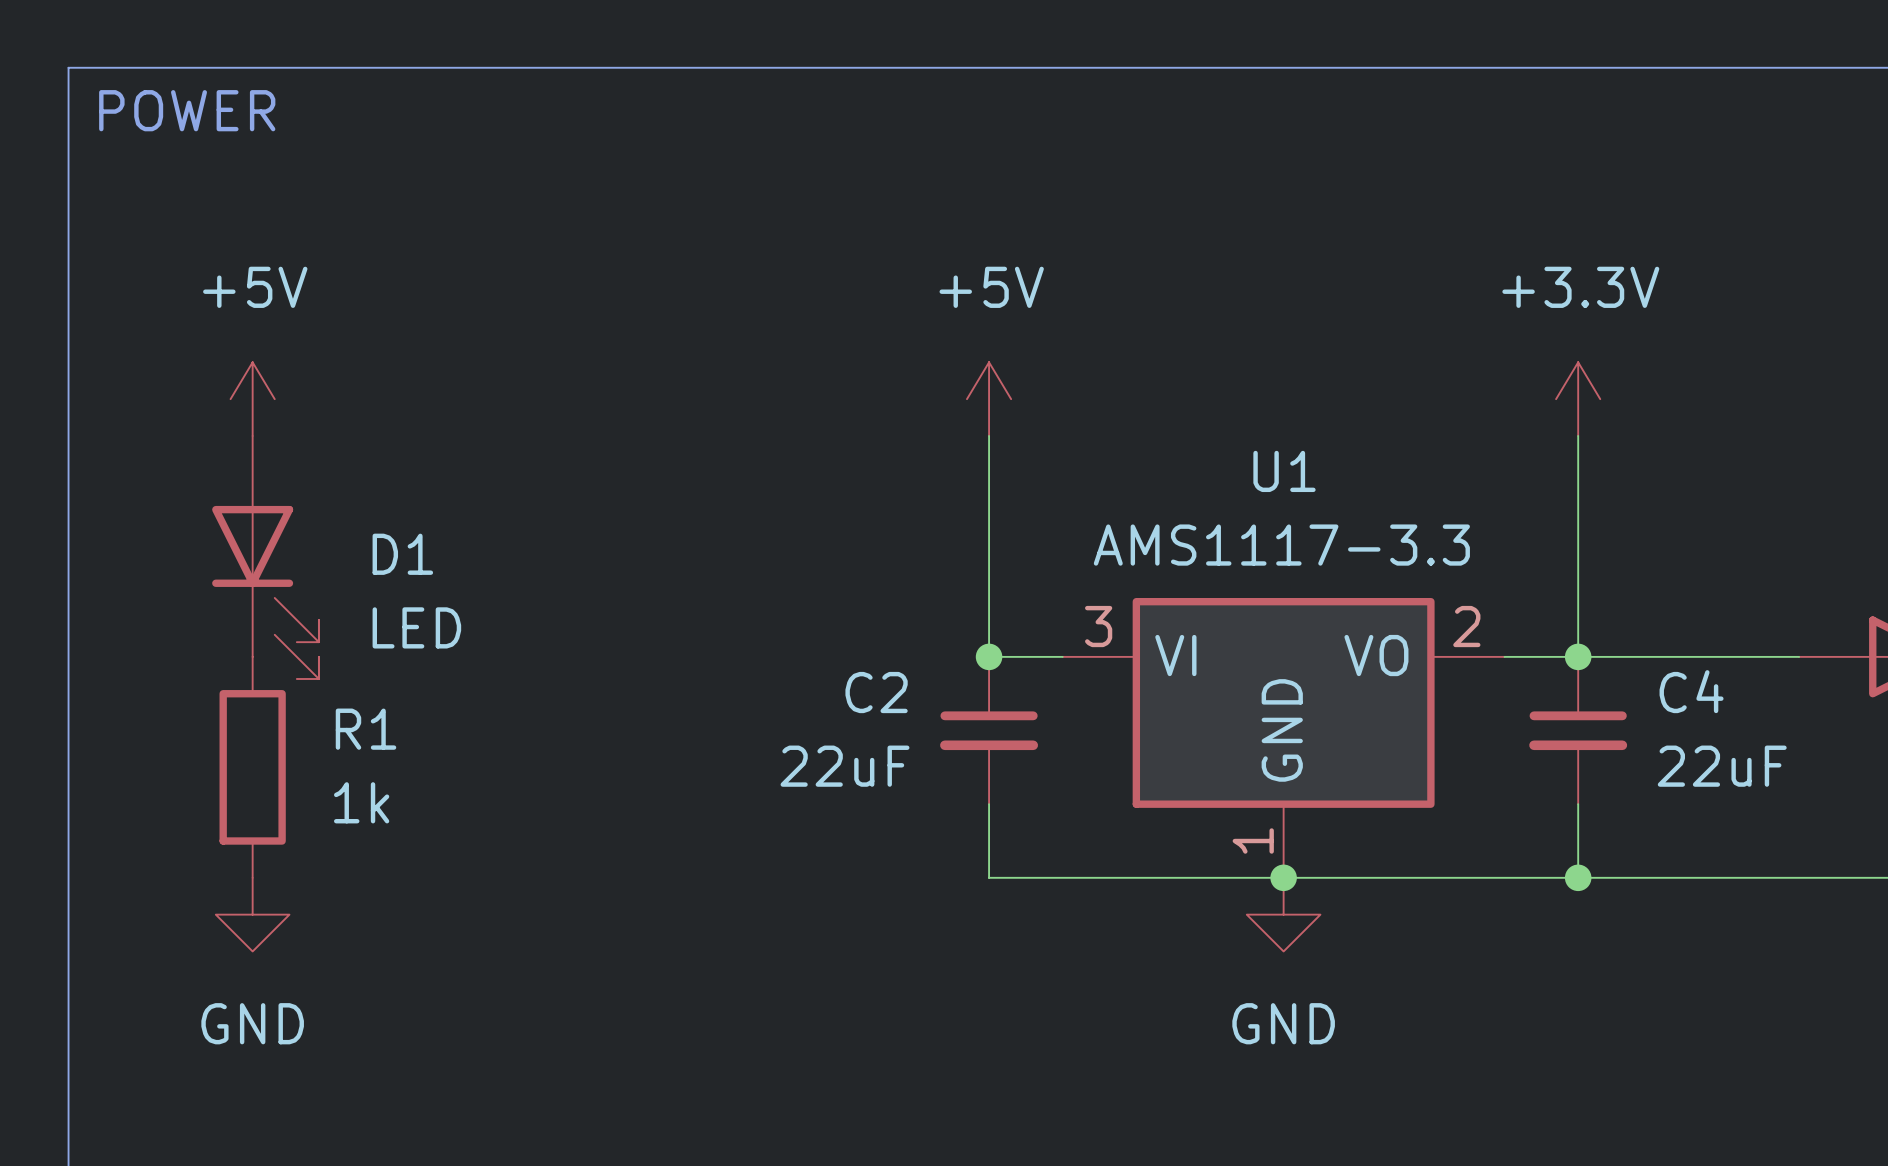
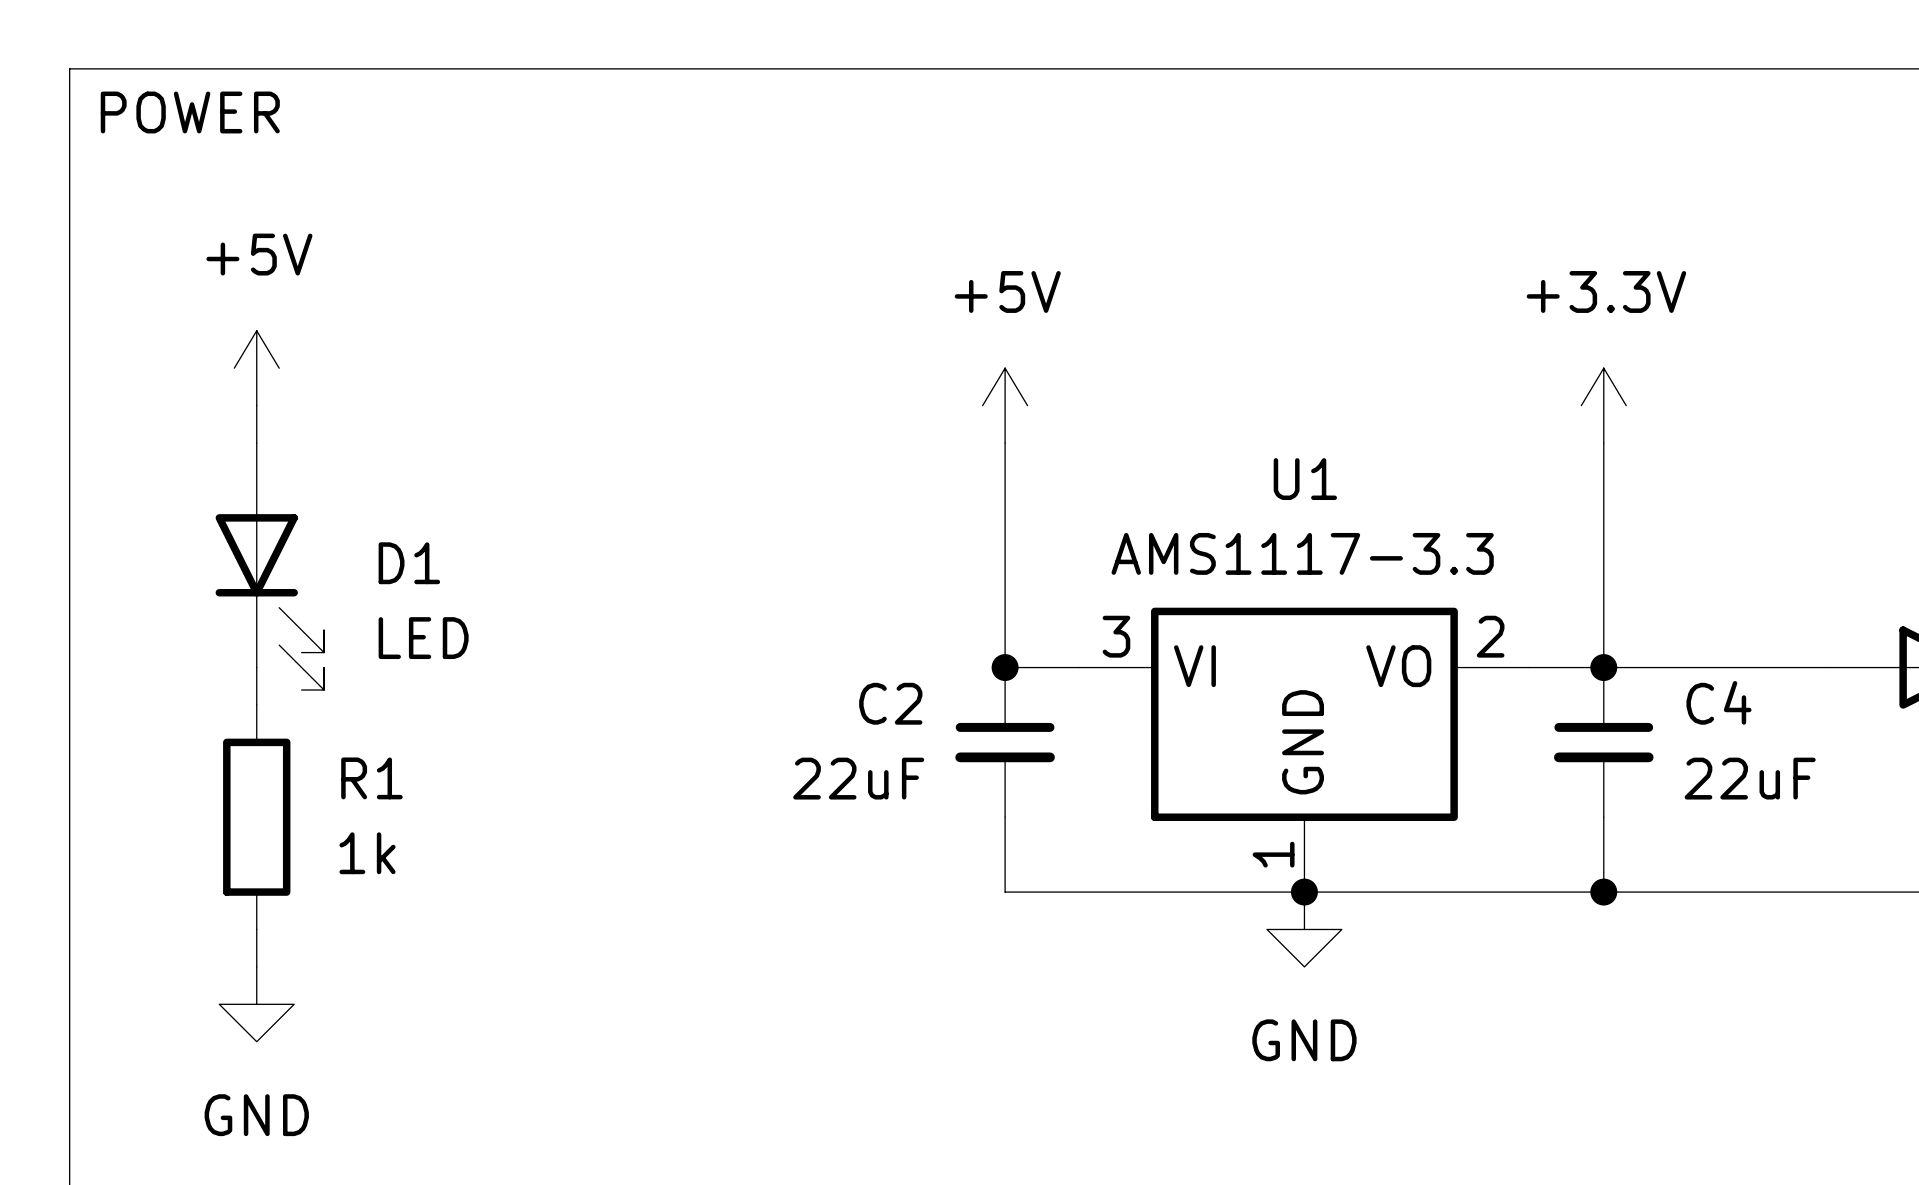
power symbol position: +5V (252, 399) -> +5V (256, 368)
R1 position: (252, 767) -> (256, 817)
wire: none -> (256, 929) (256, 966)
power symbol position: GND (252, 914) -> GND (256, 1004)

